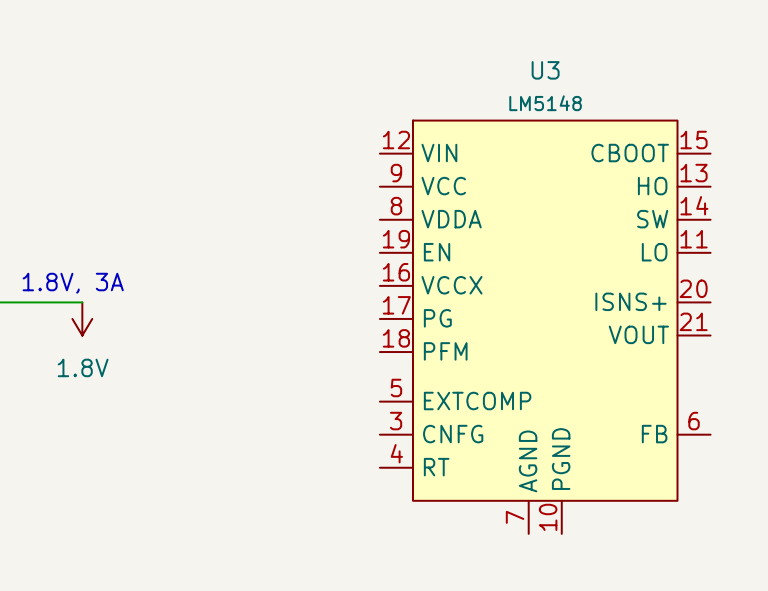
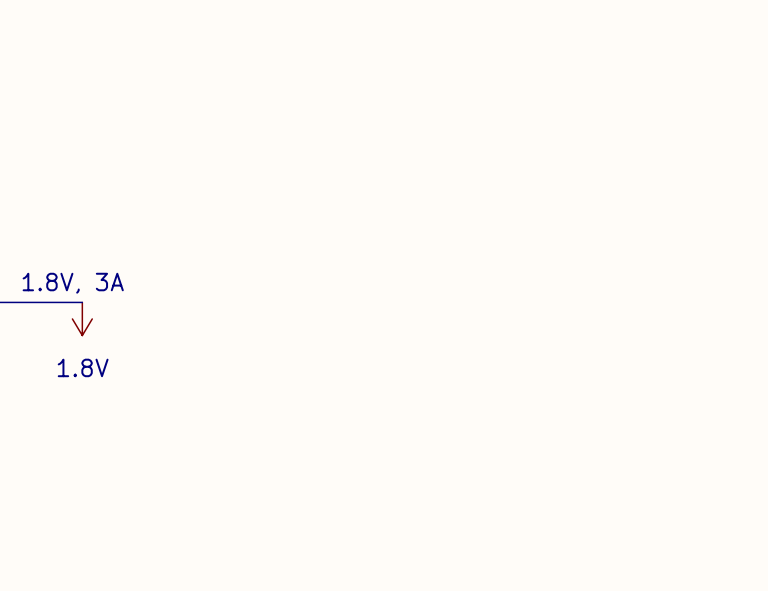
U3: LM5148 (545, 327) -> none

